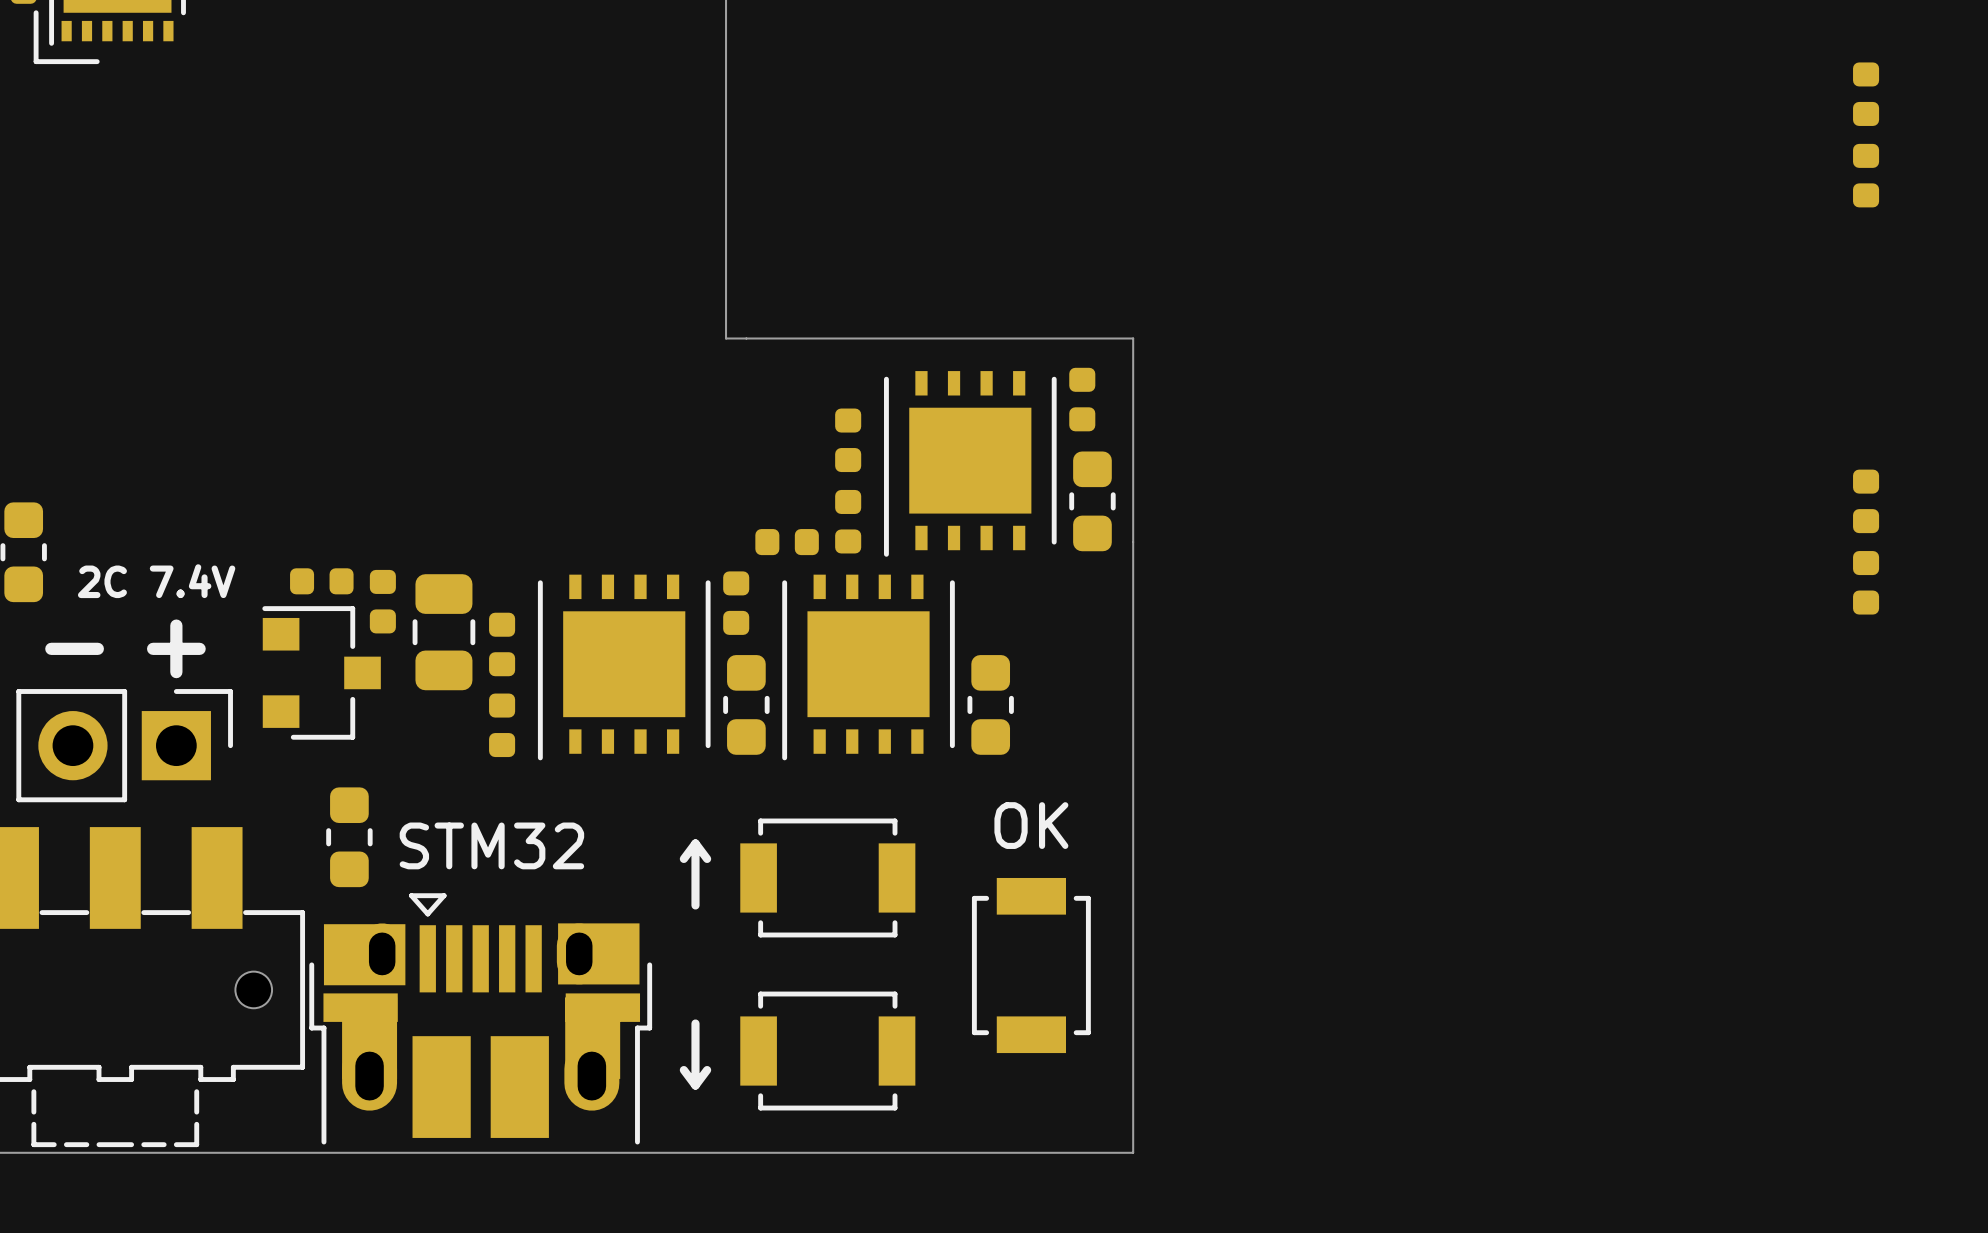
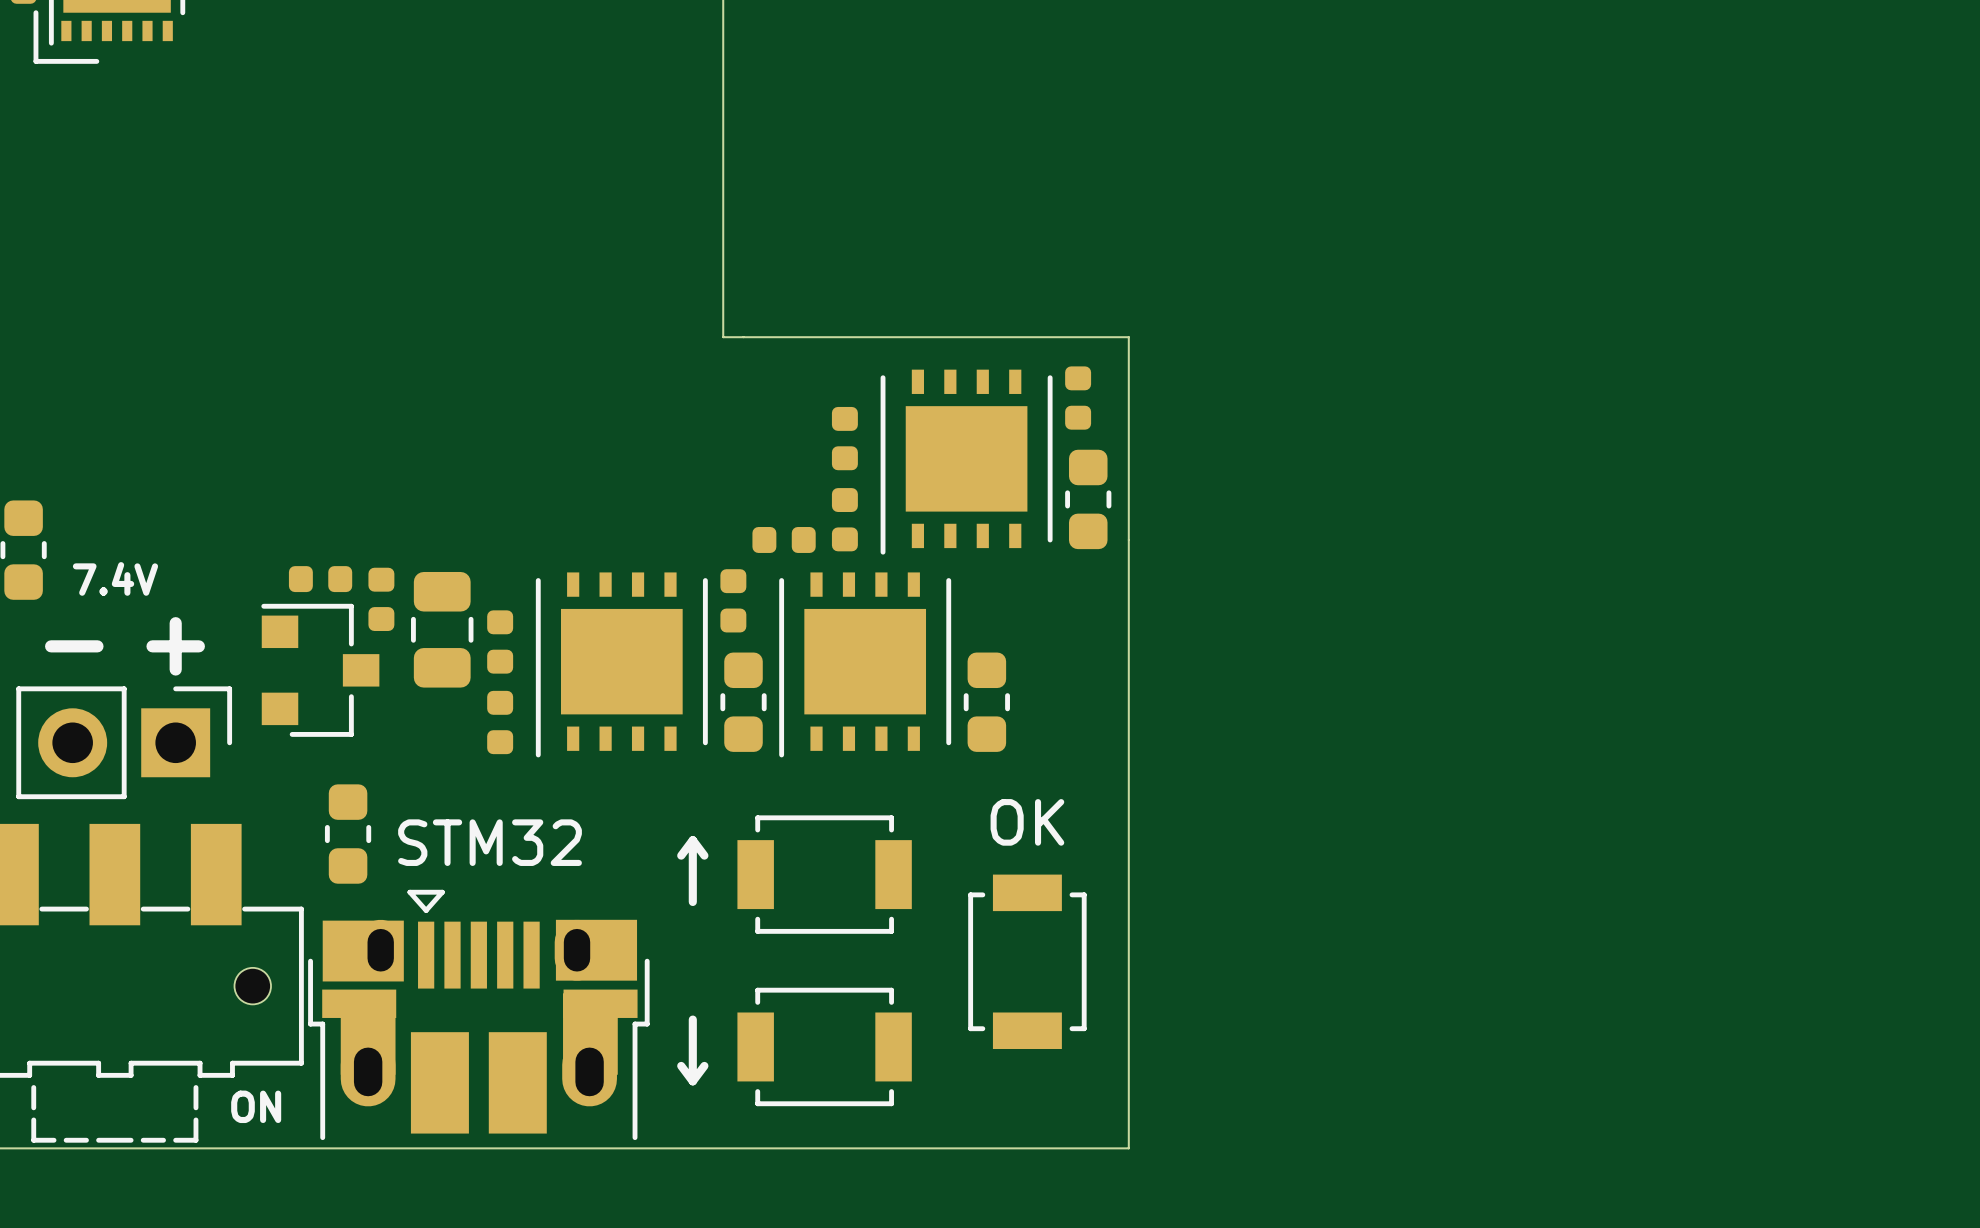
part: (1866, 94) -> none
part: (1866, 175) -> none
part: (1866, 501) -> none
text: 2C 7.4V (156, 581) -> 7.4V (115, 578)
part: (1866, 582) -> none
text: none -> ON (256, 1106)

